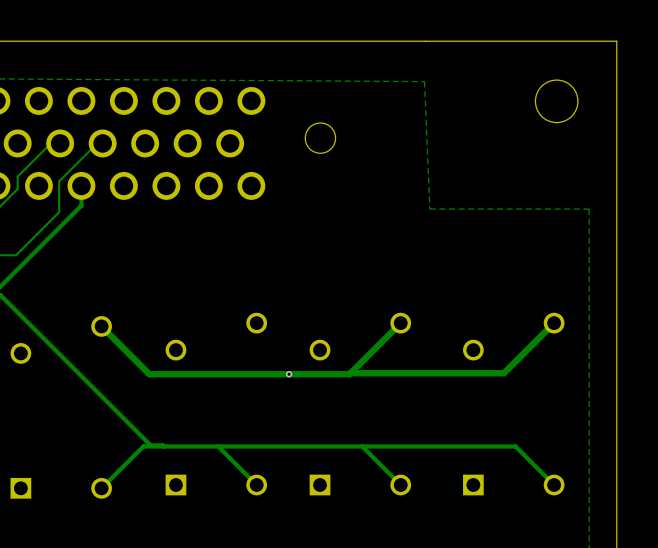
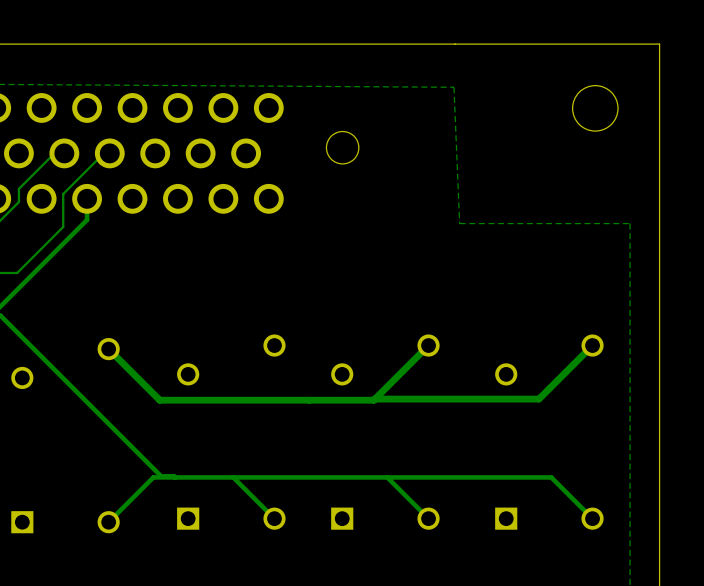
via: (289, 374) -> none

